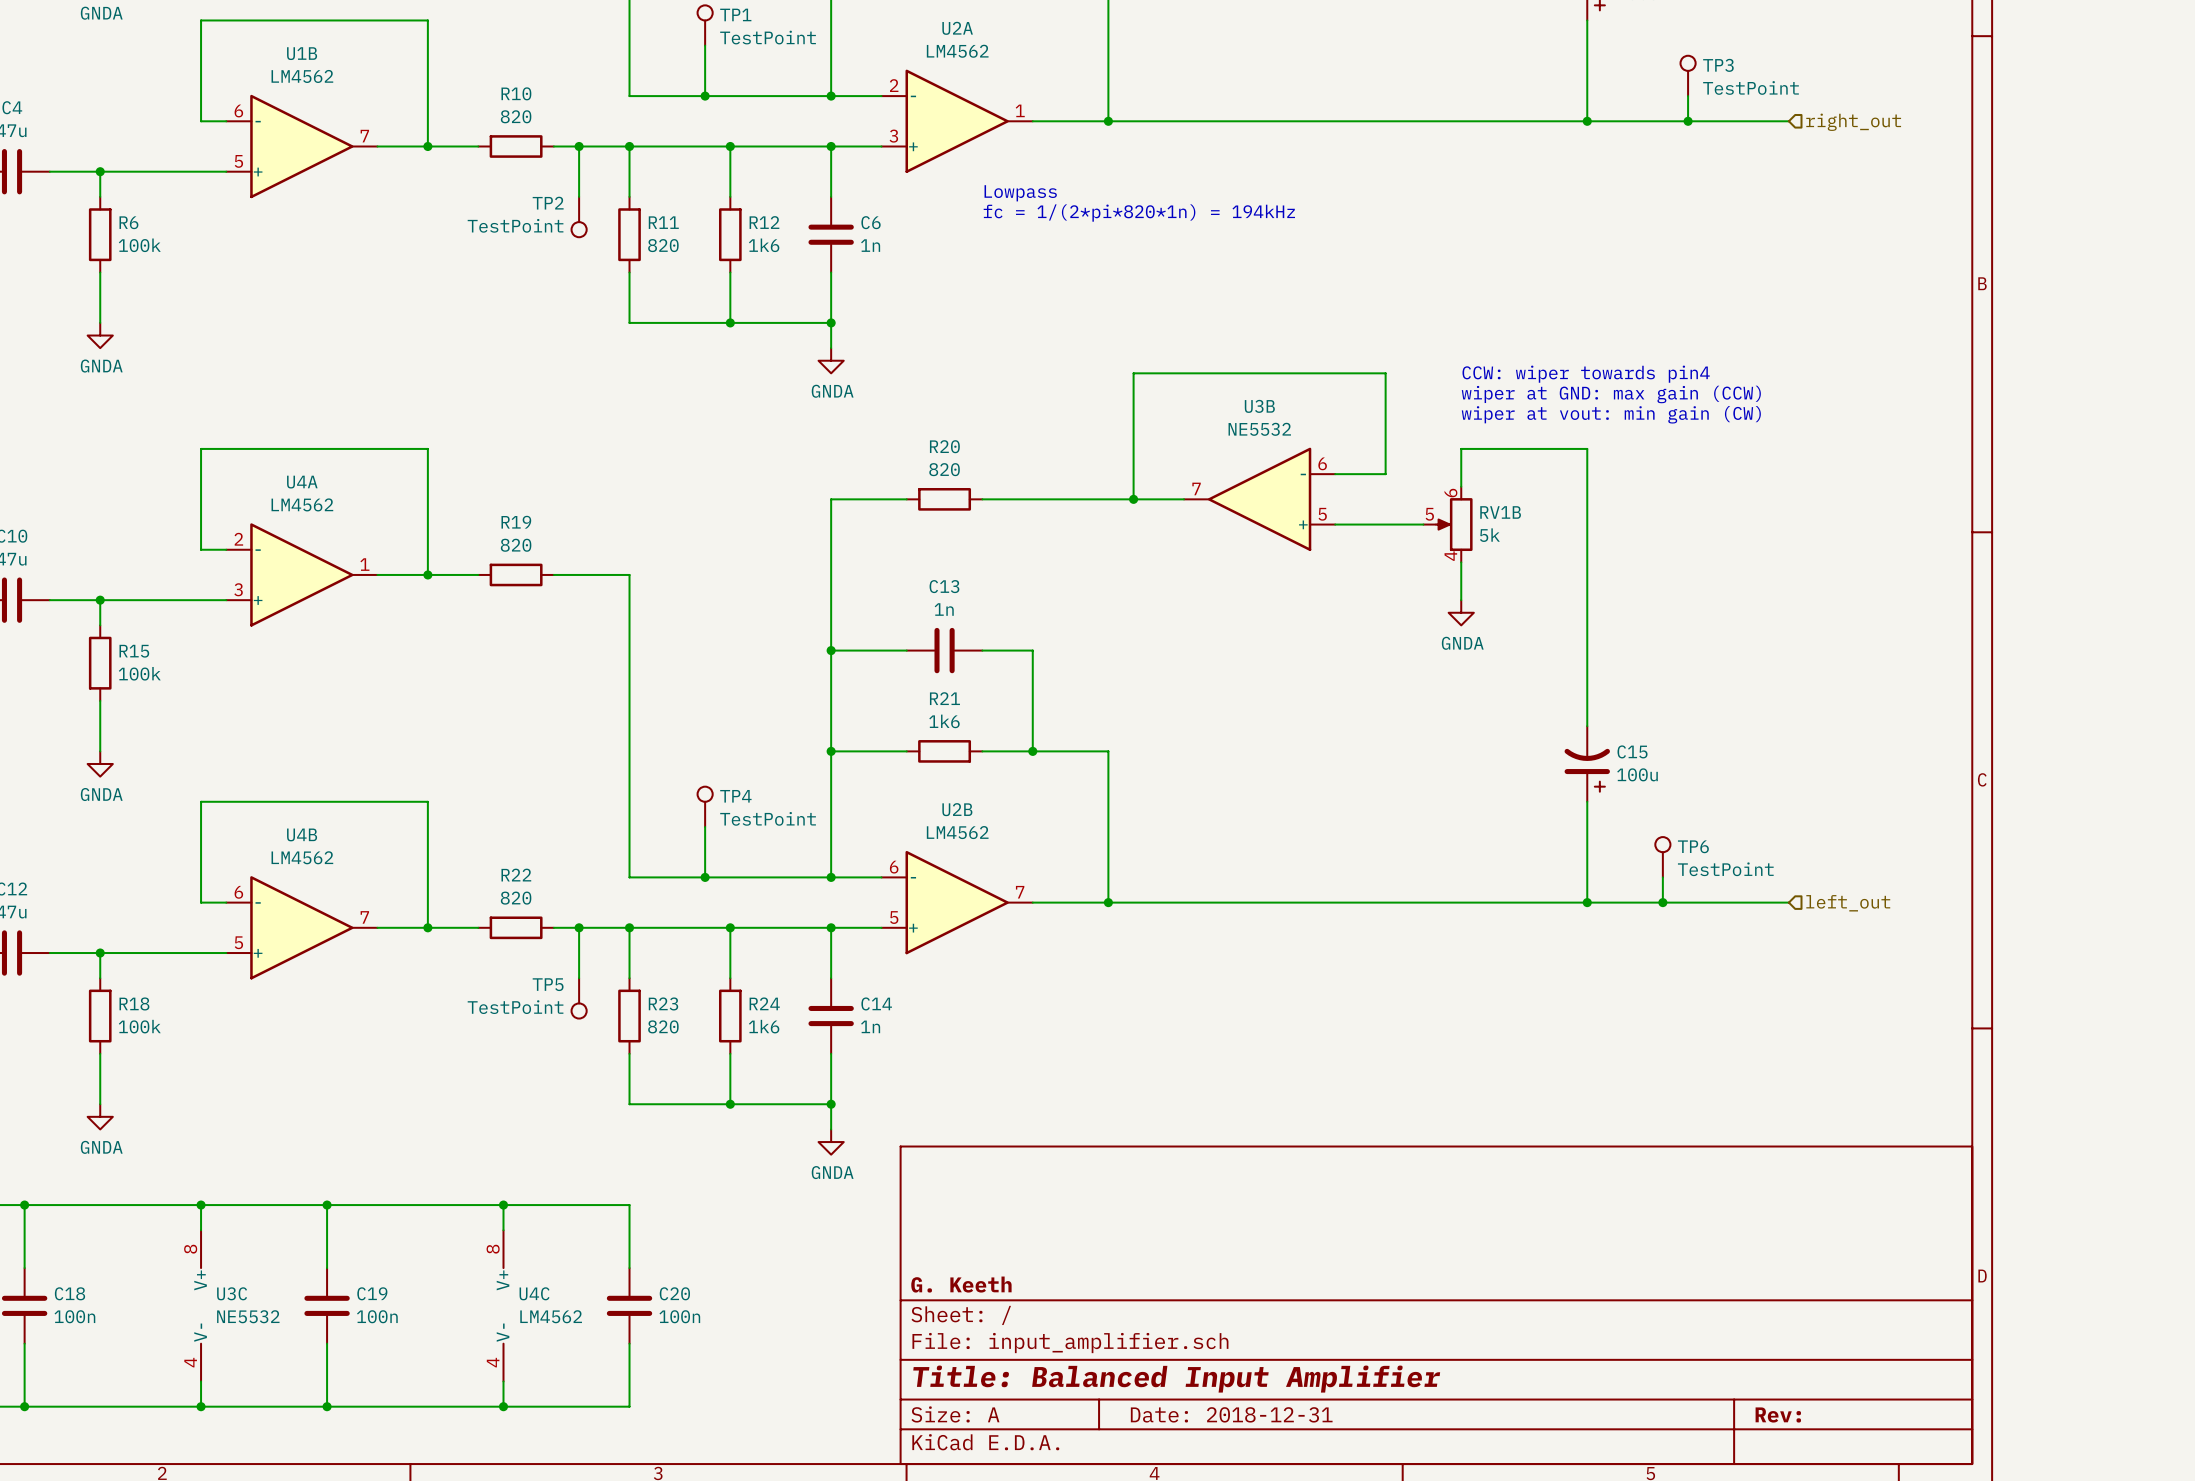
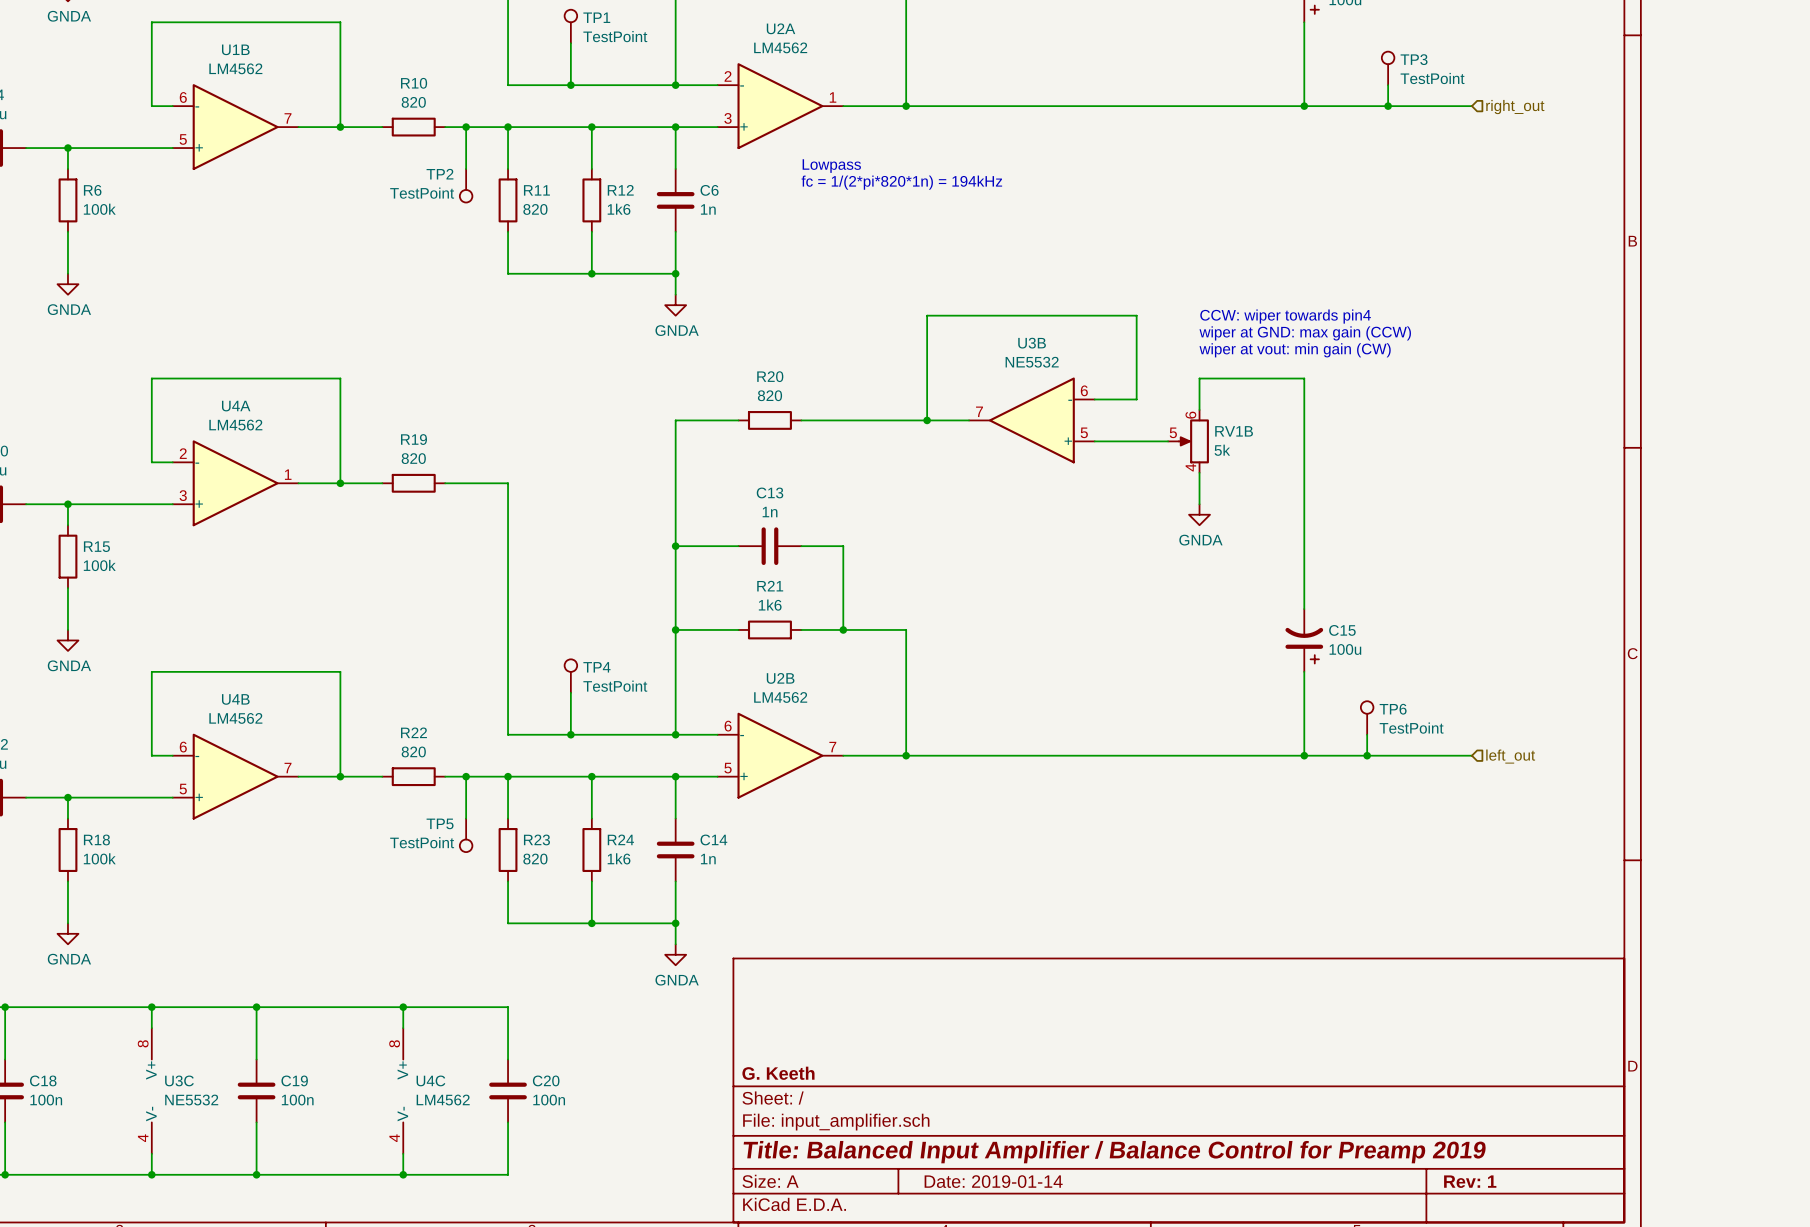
title block: Title: Balanced Input Amplifier (1176, 1379) -> Title: Balanced Input Amplifier / Balance Control for Preamp 2019 (1114, 1152)
title block: Date: 2018-12-31 (1231, 1414) -> Date: 2019-01-14 (993, 1181)
title block: Rev: (1778, 1414) -> Rev: 1 (1470, 1181)

